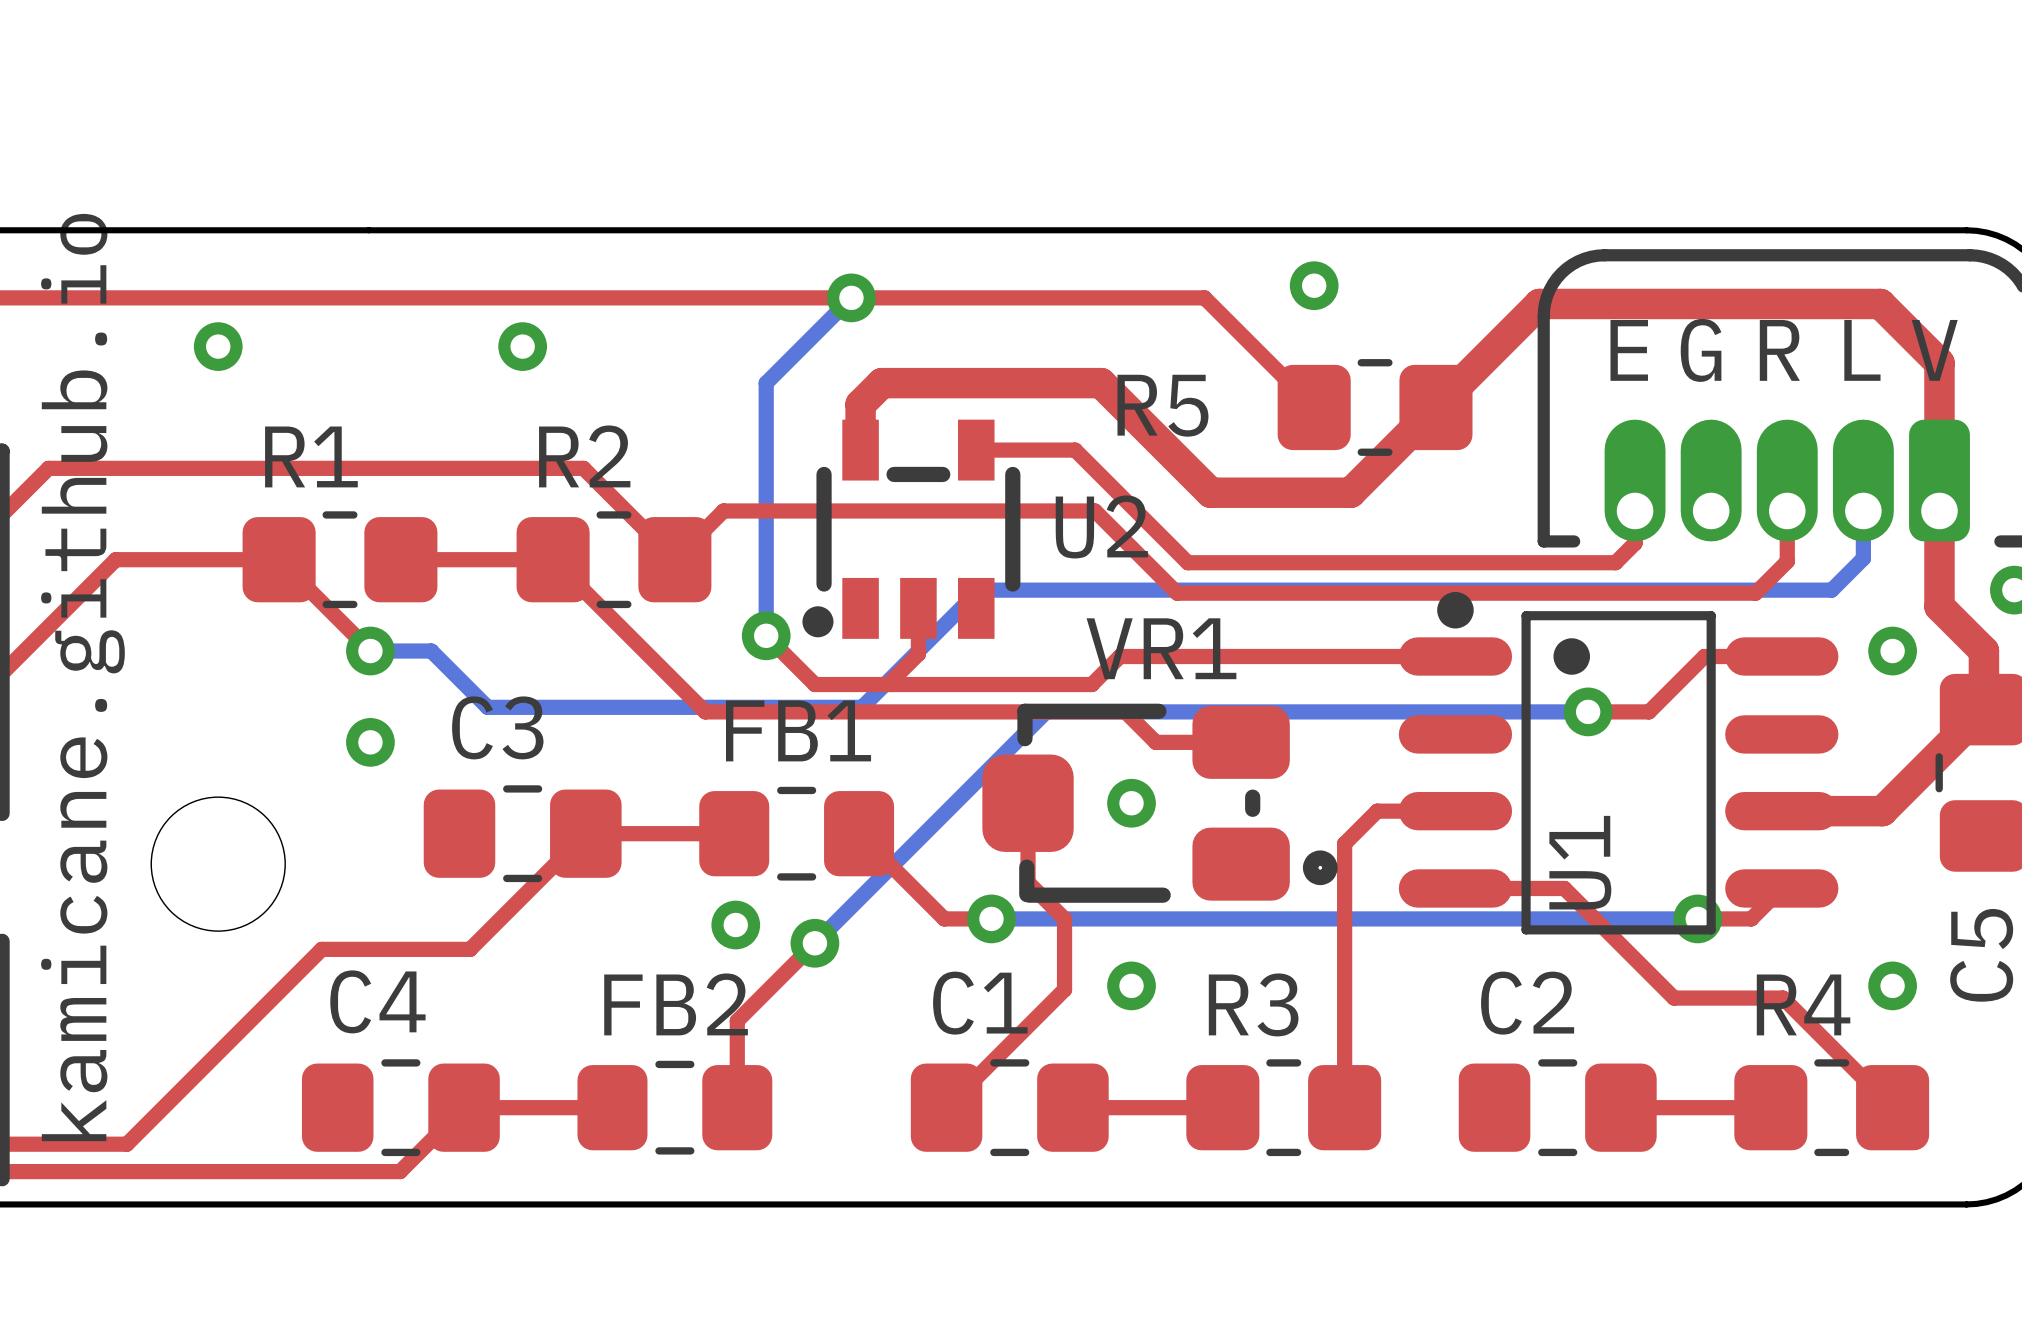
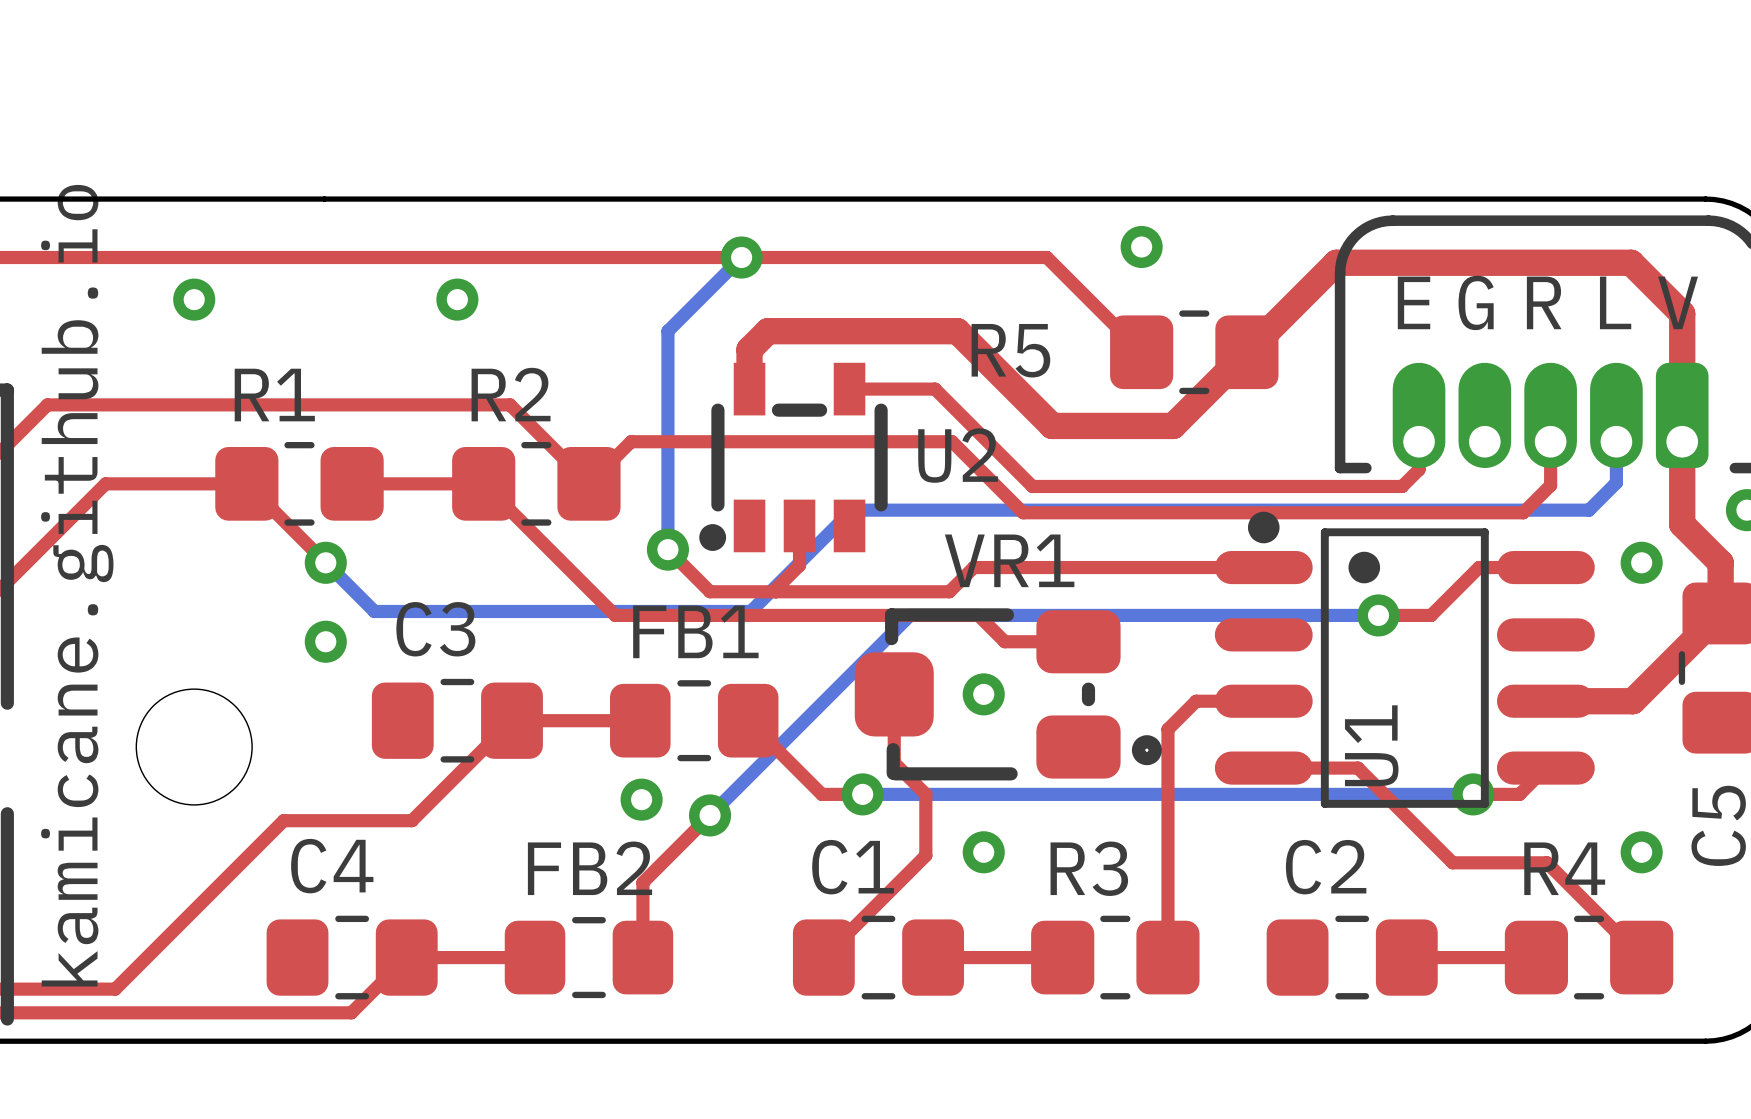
bottom track: (370, 651) (431, 651) (487, 707) -> (325, 562) (374, 611) (427, 611)

